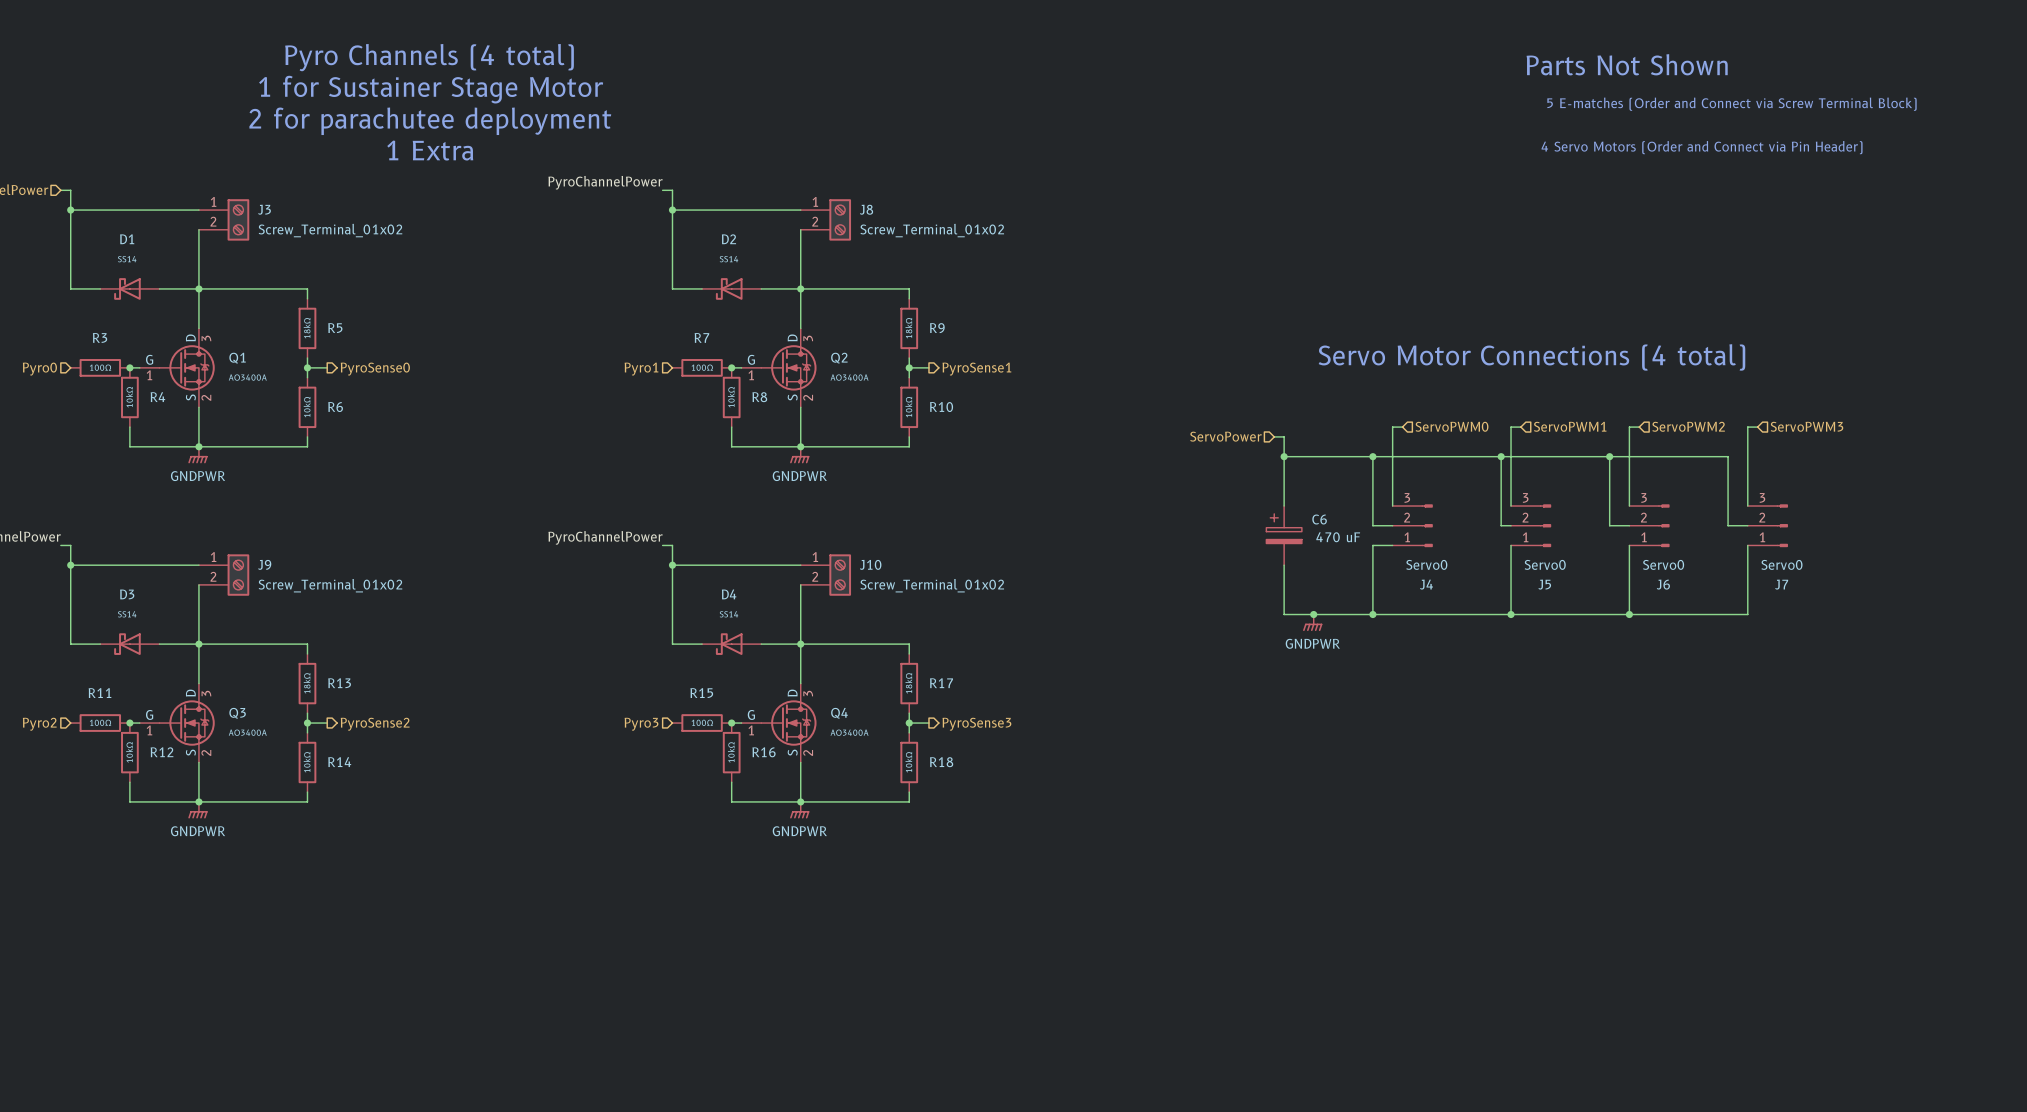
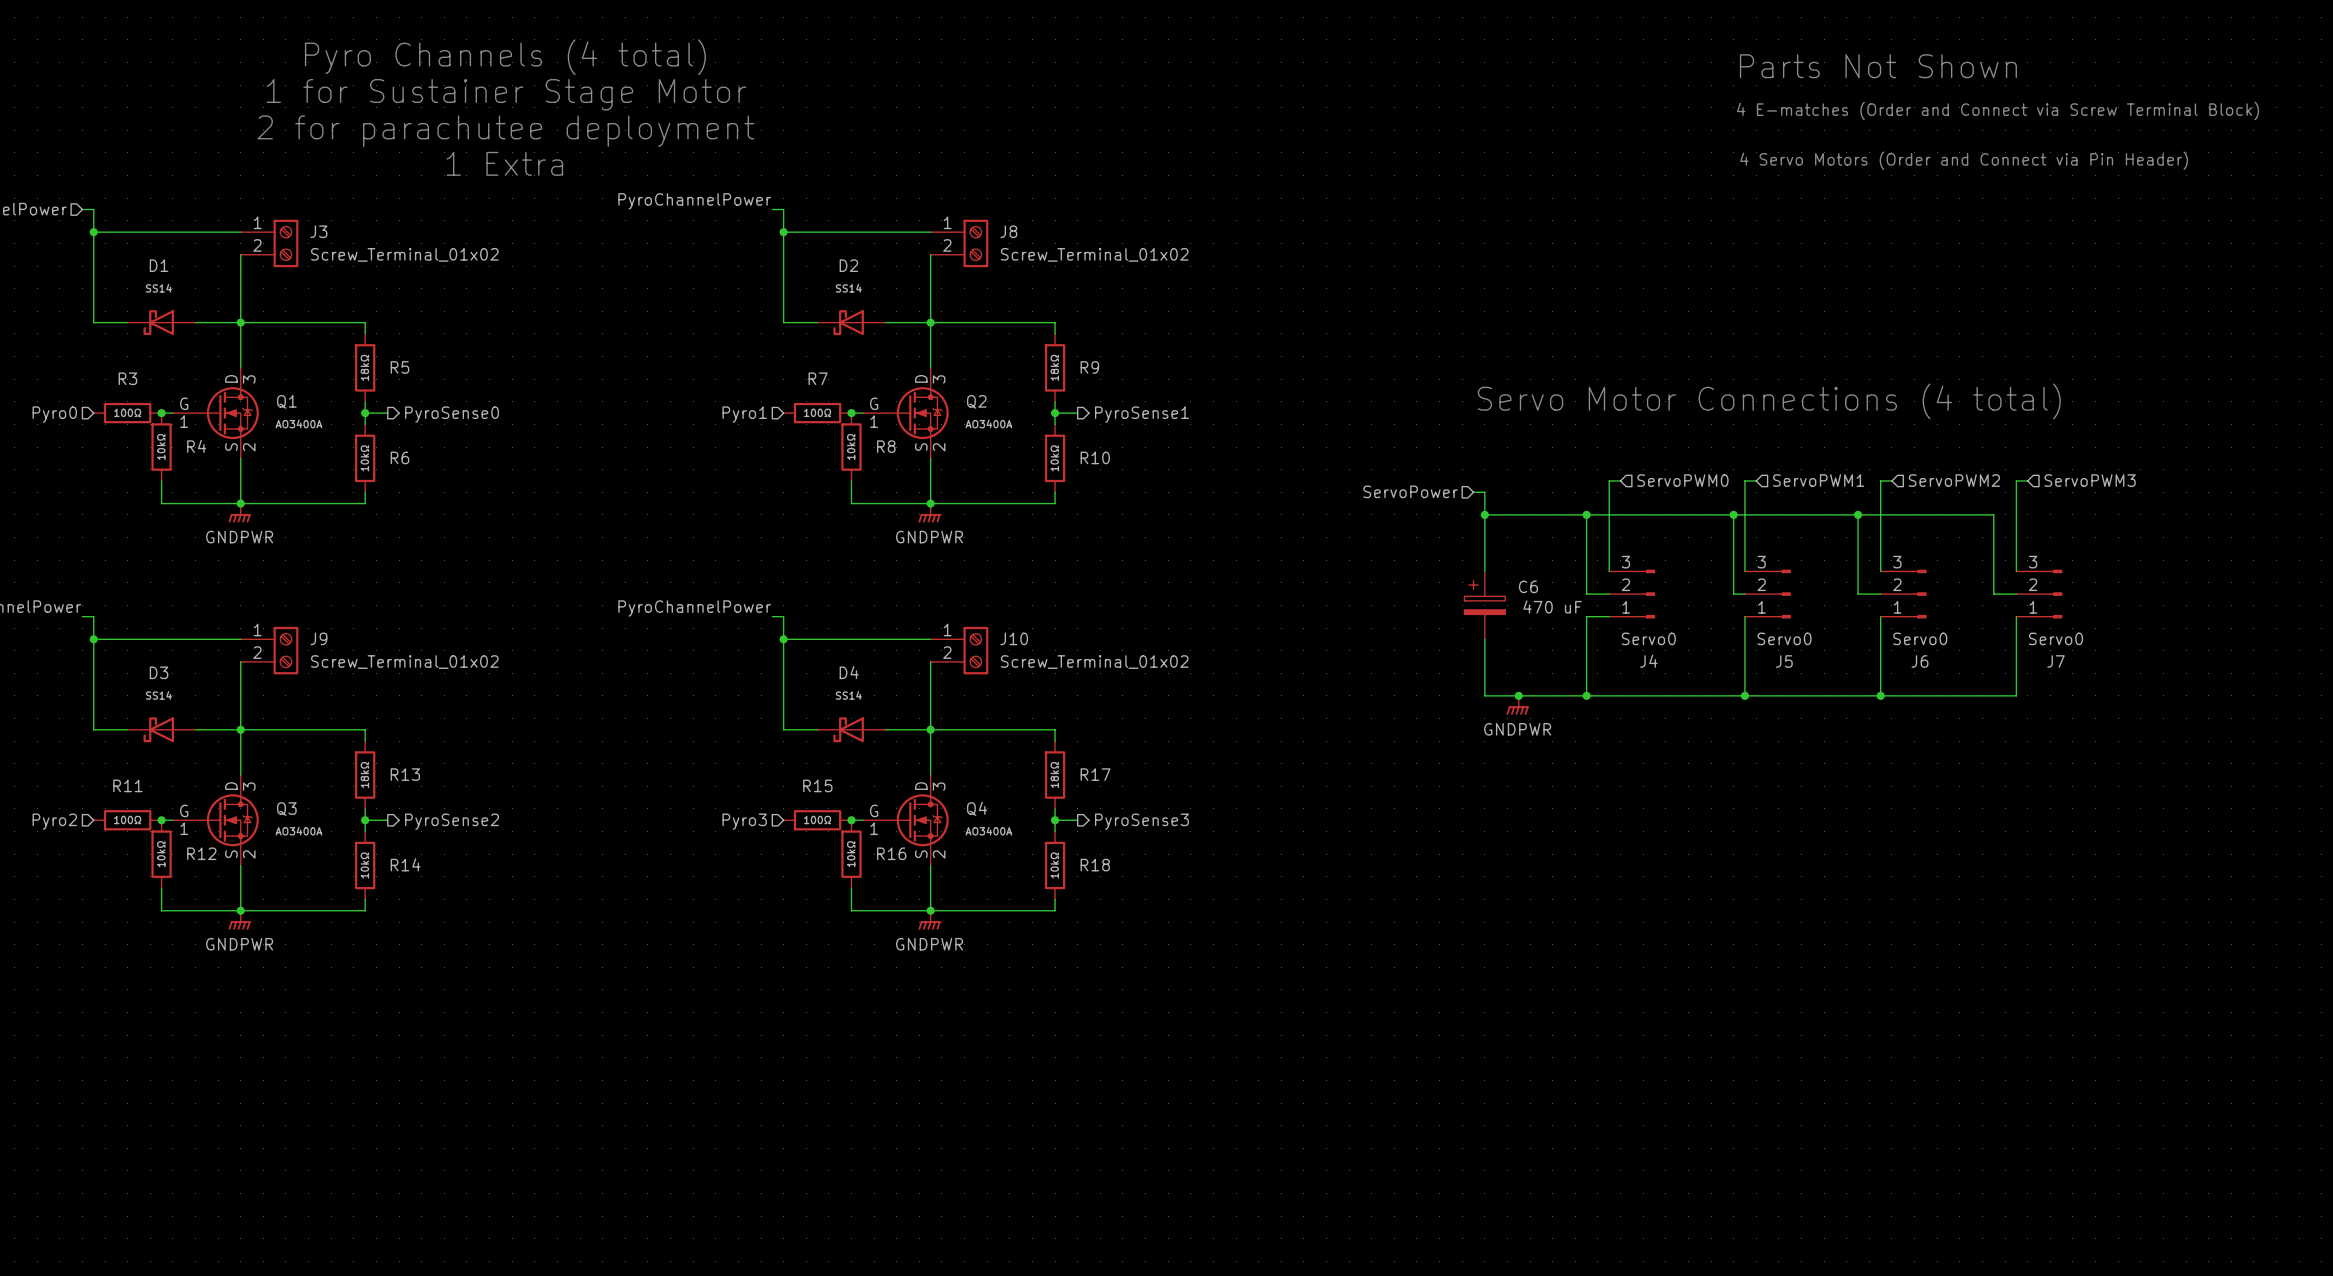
text: 5 E-matches (Order and Connect via Screw Terminal Block) (1732, 104) -> 4 E-matches (Order and Connect via Screw Terminal Block) (1998, 110)

